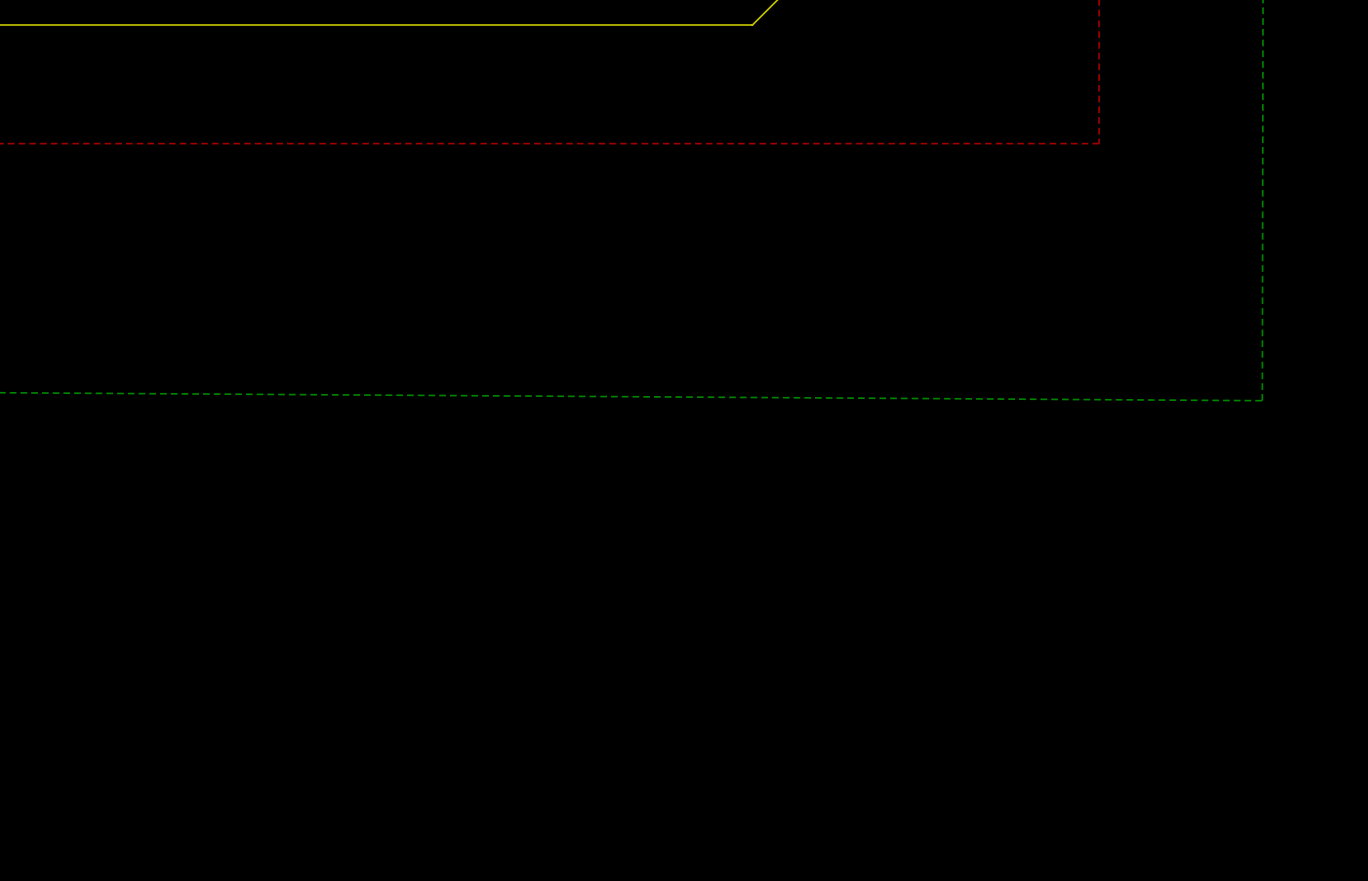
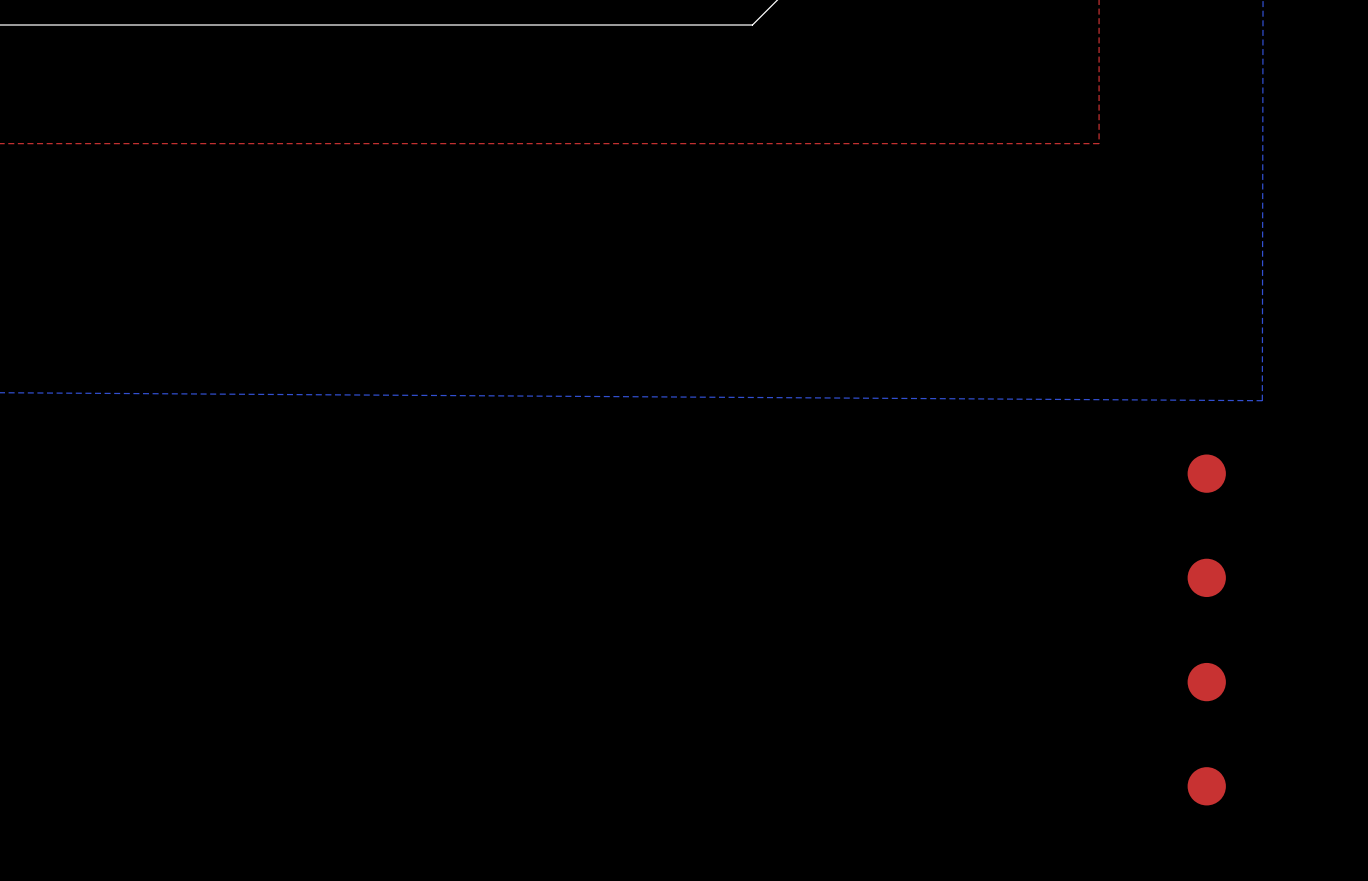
part: none -> (1206, 473)
part: none -> (1206, 577)
part: none -> (1206, 682)
part: none -> (1206, 786)

